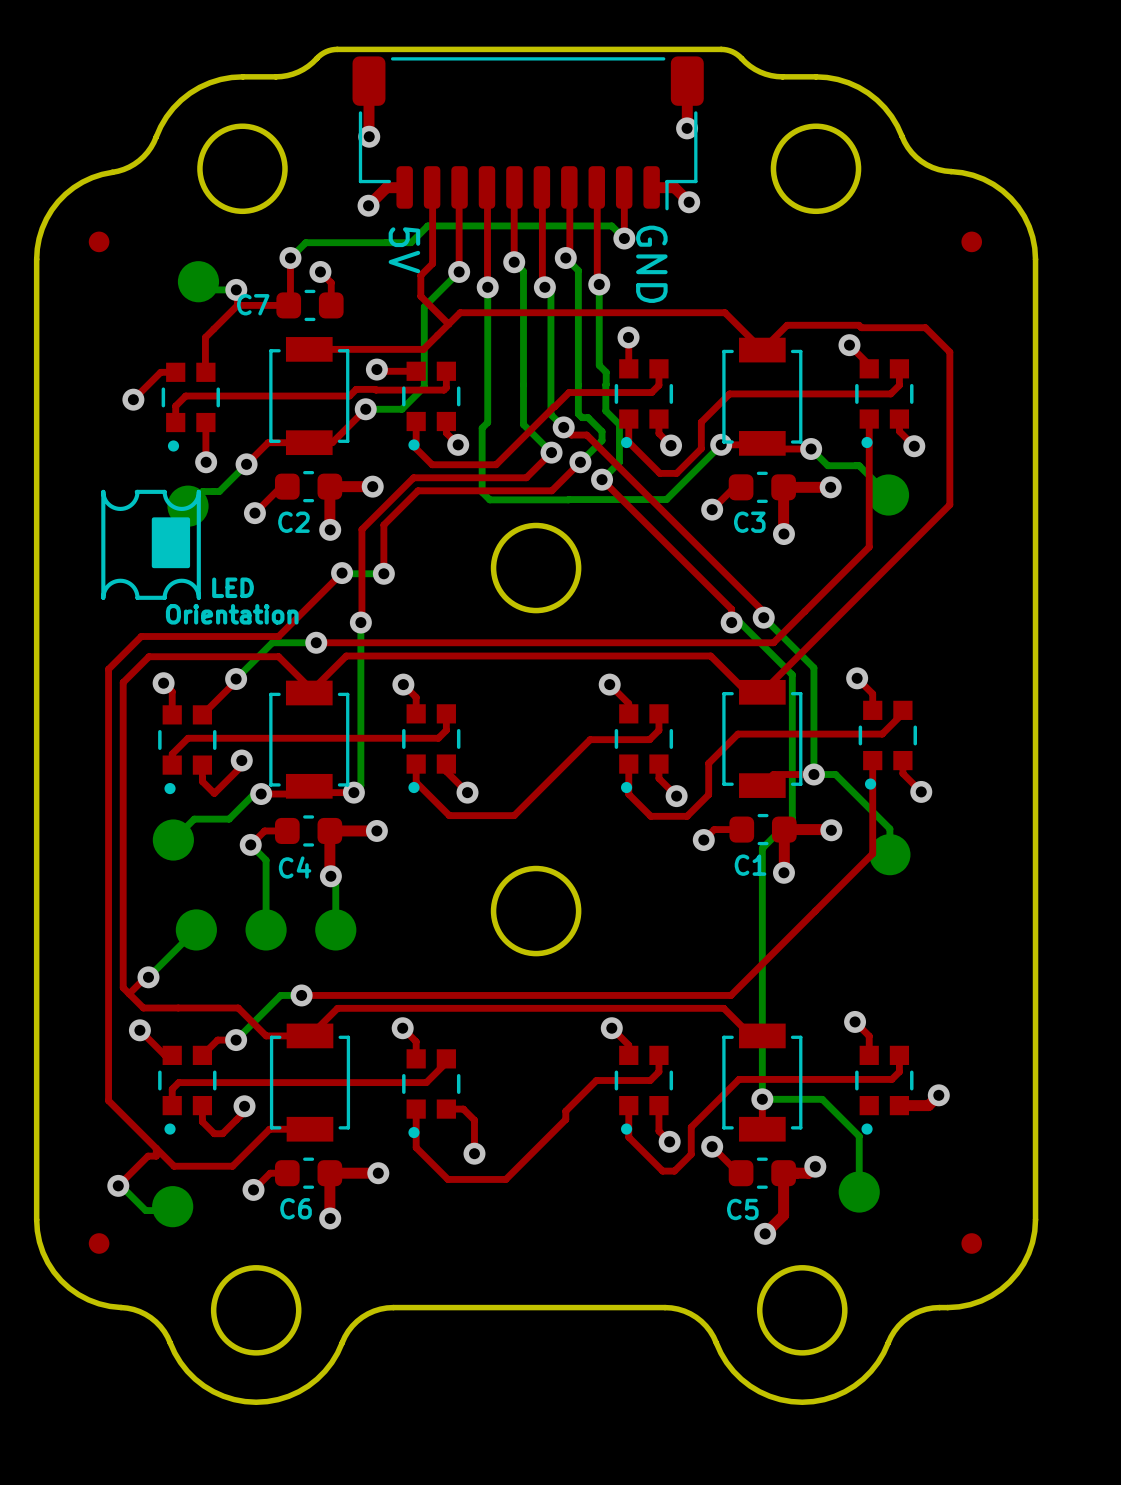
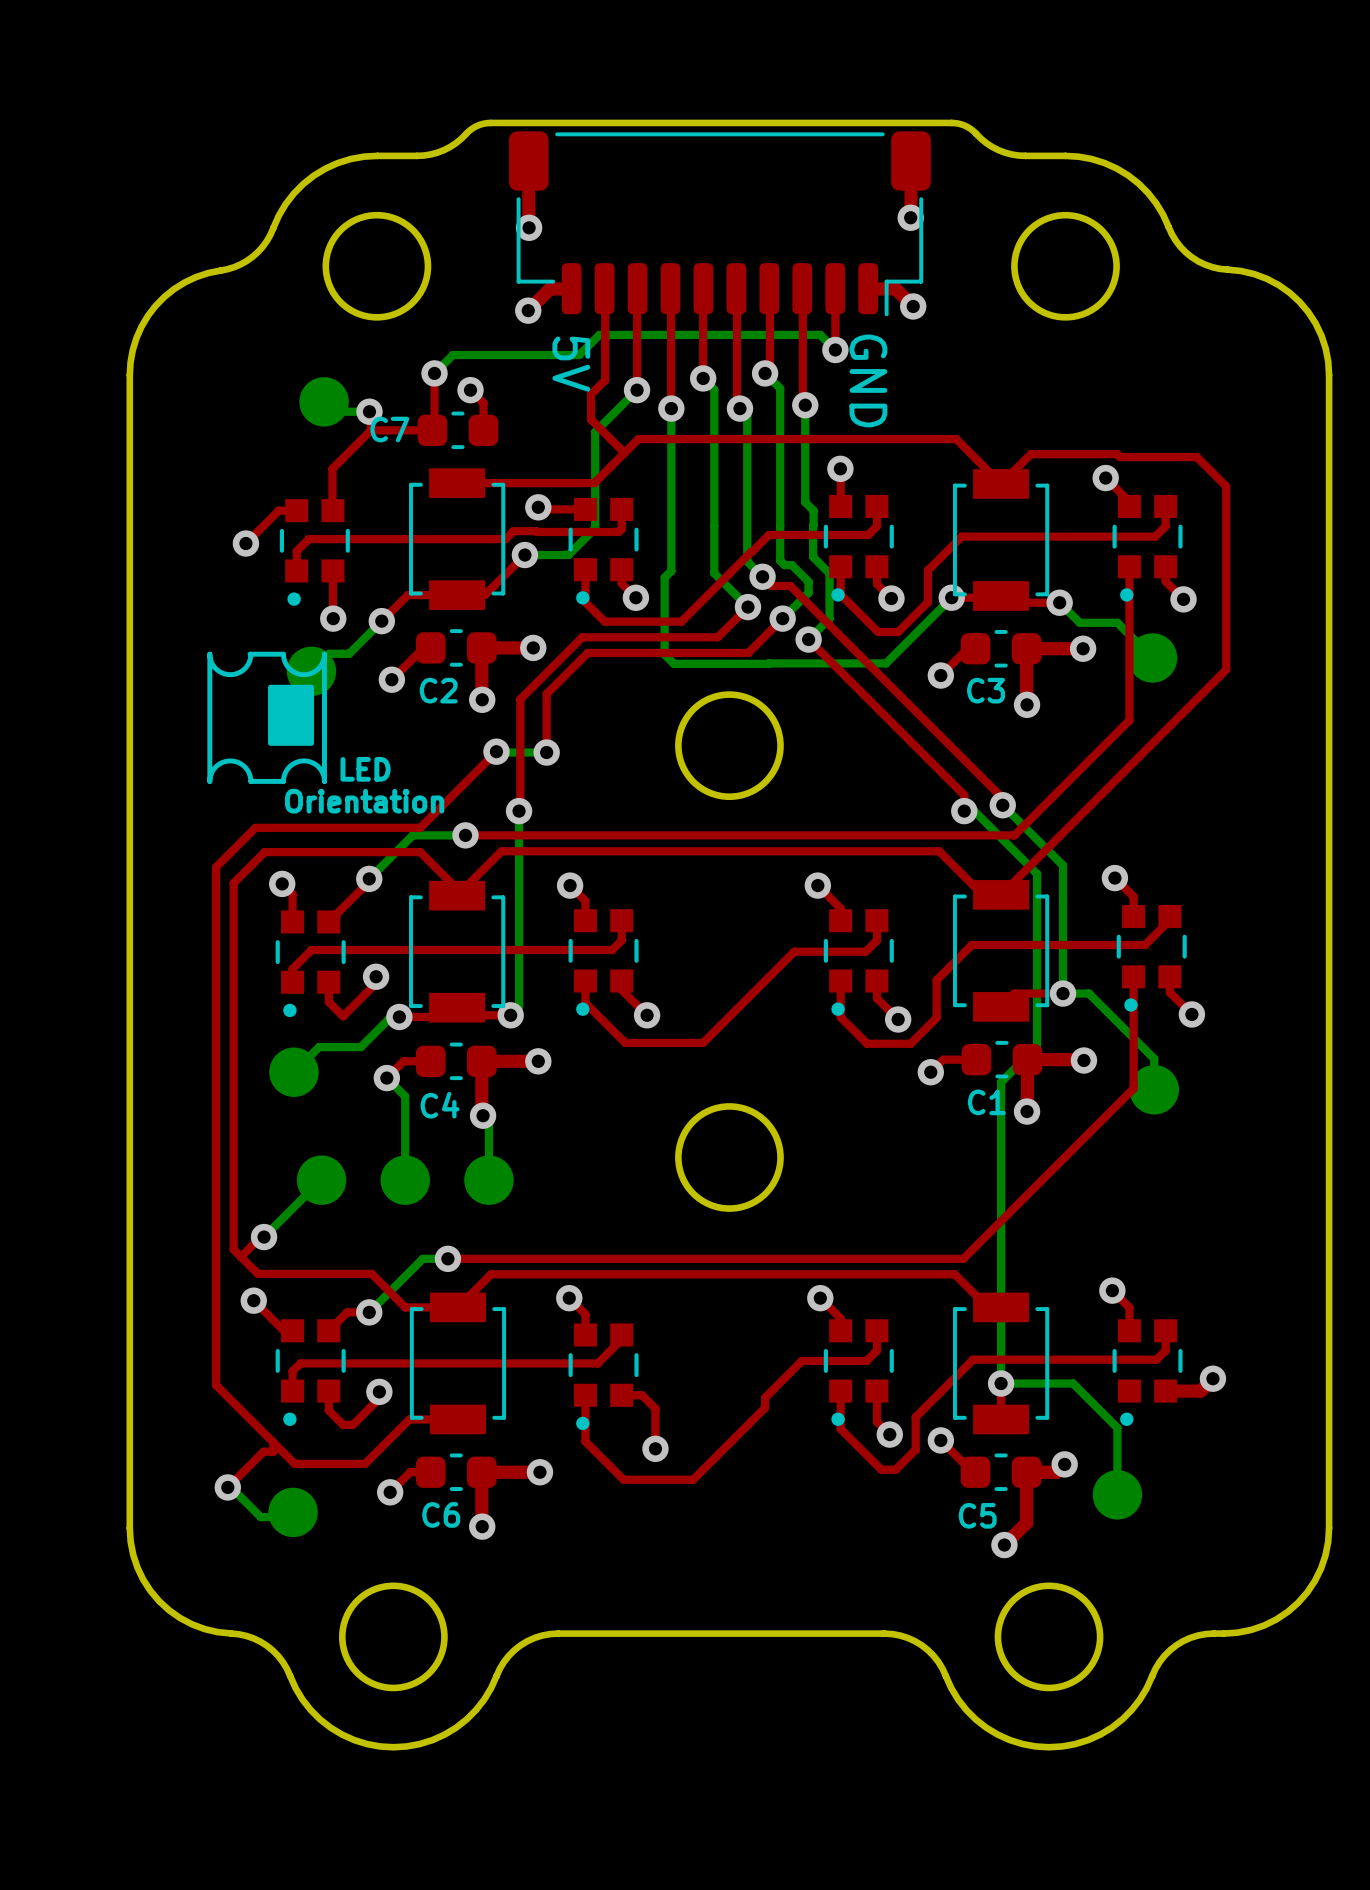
part: (99, 241) -> none
part: (971, 241) -> none
part: (99, 1243) -> none
part: (971, 1243) -> none

